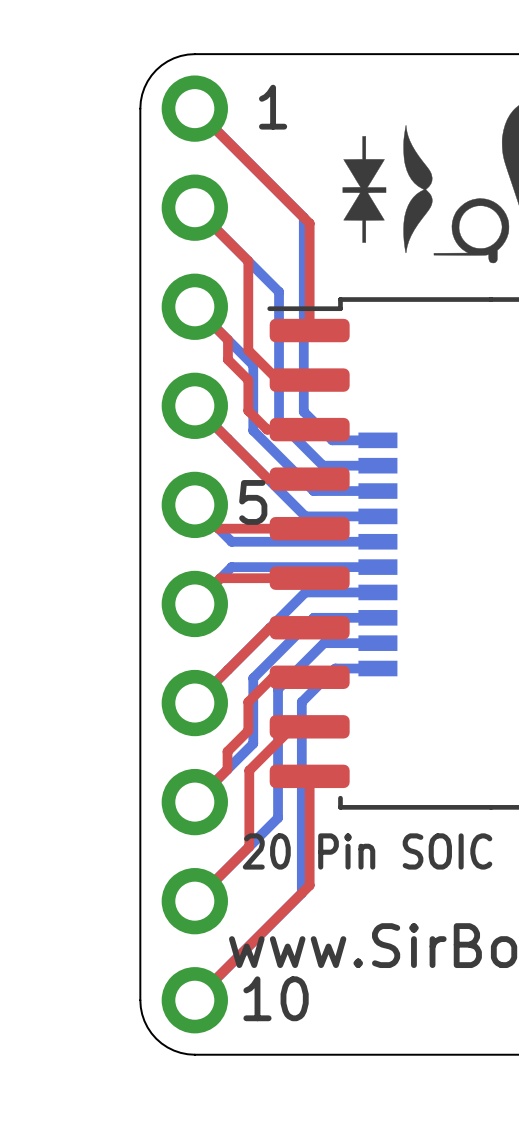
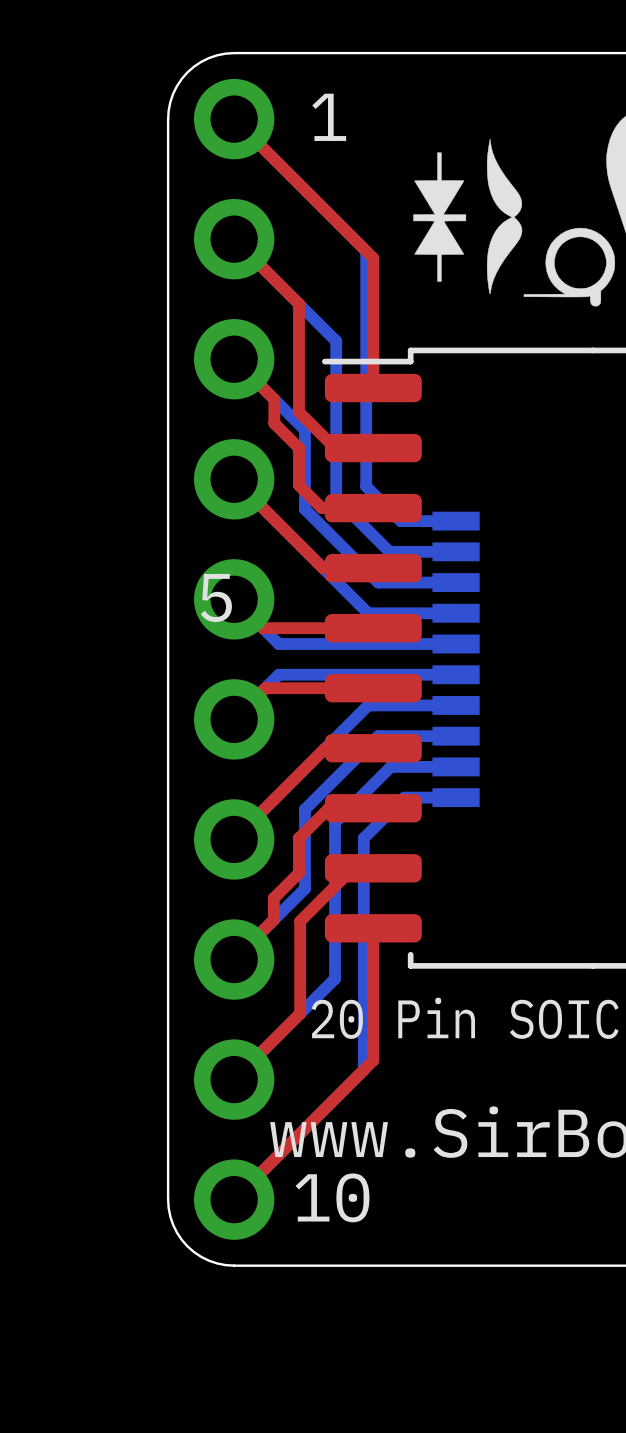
text position: 5 (253, 502) -> 5 (216, 597)

